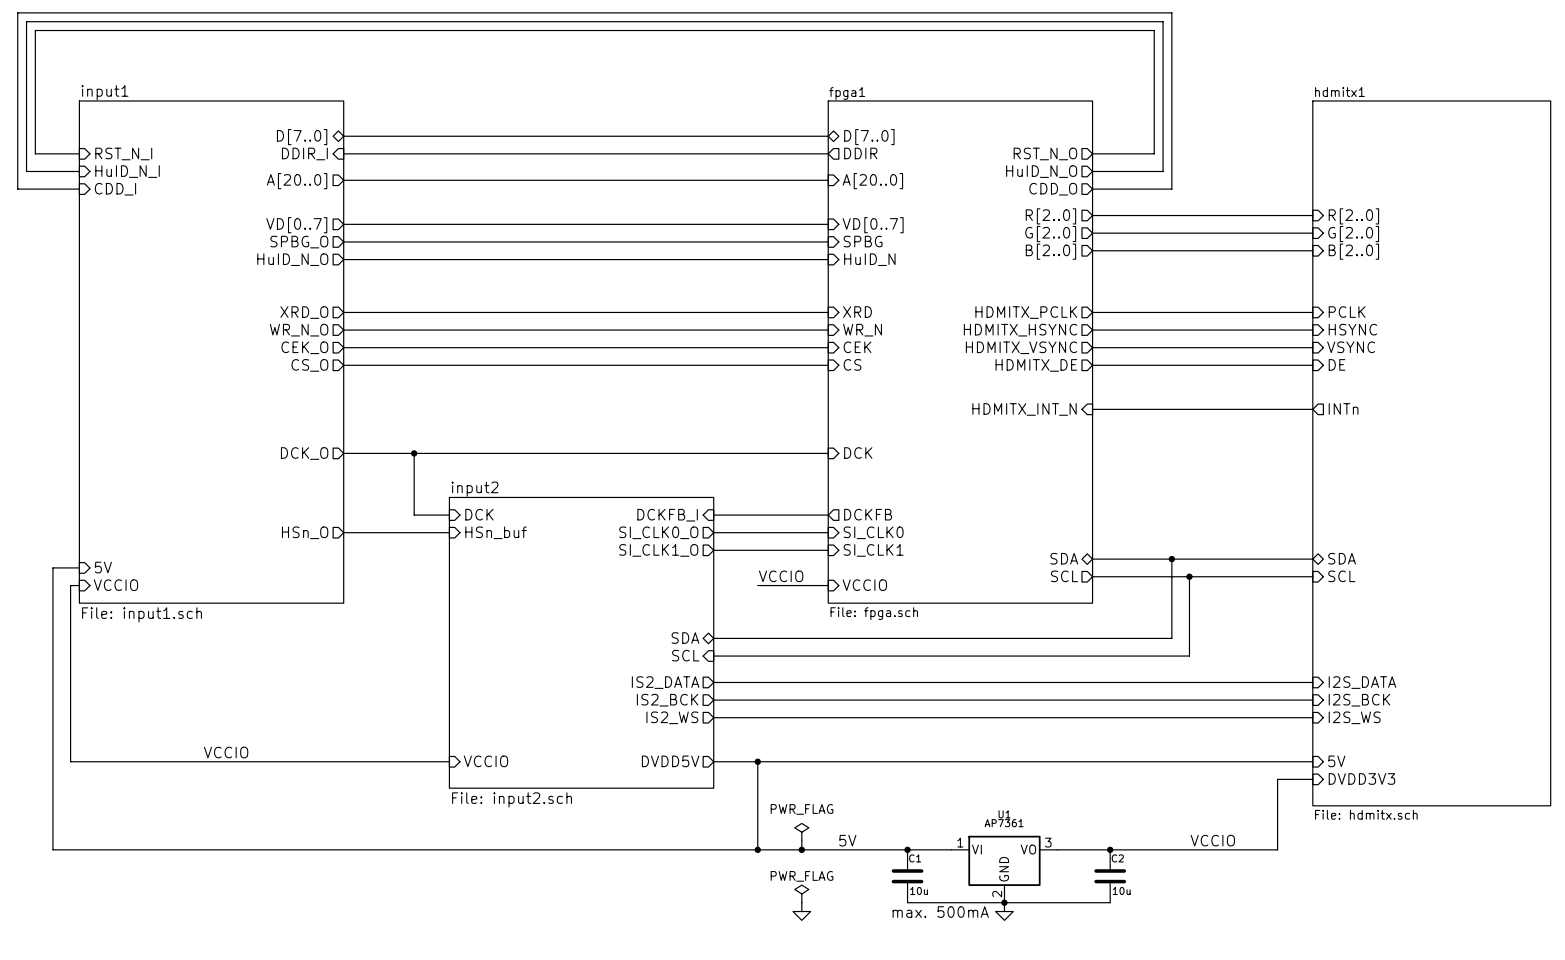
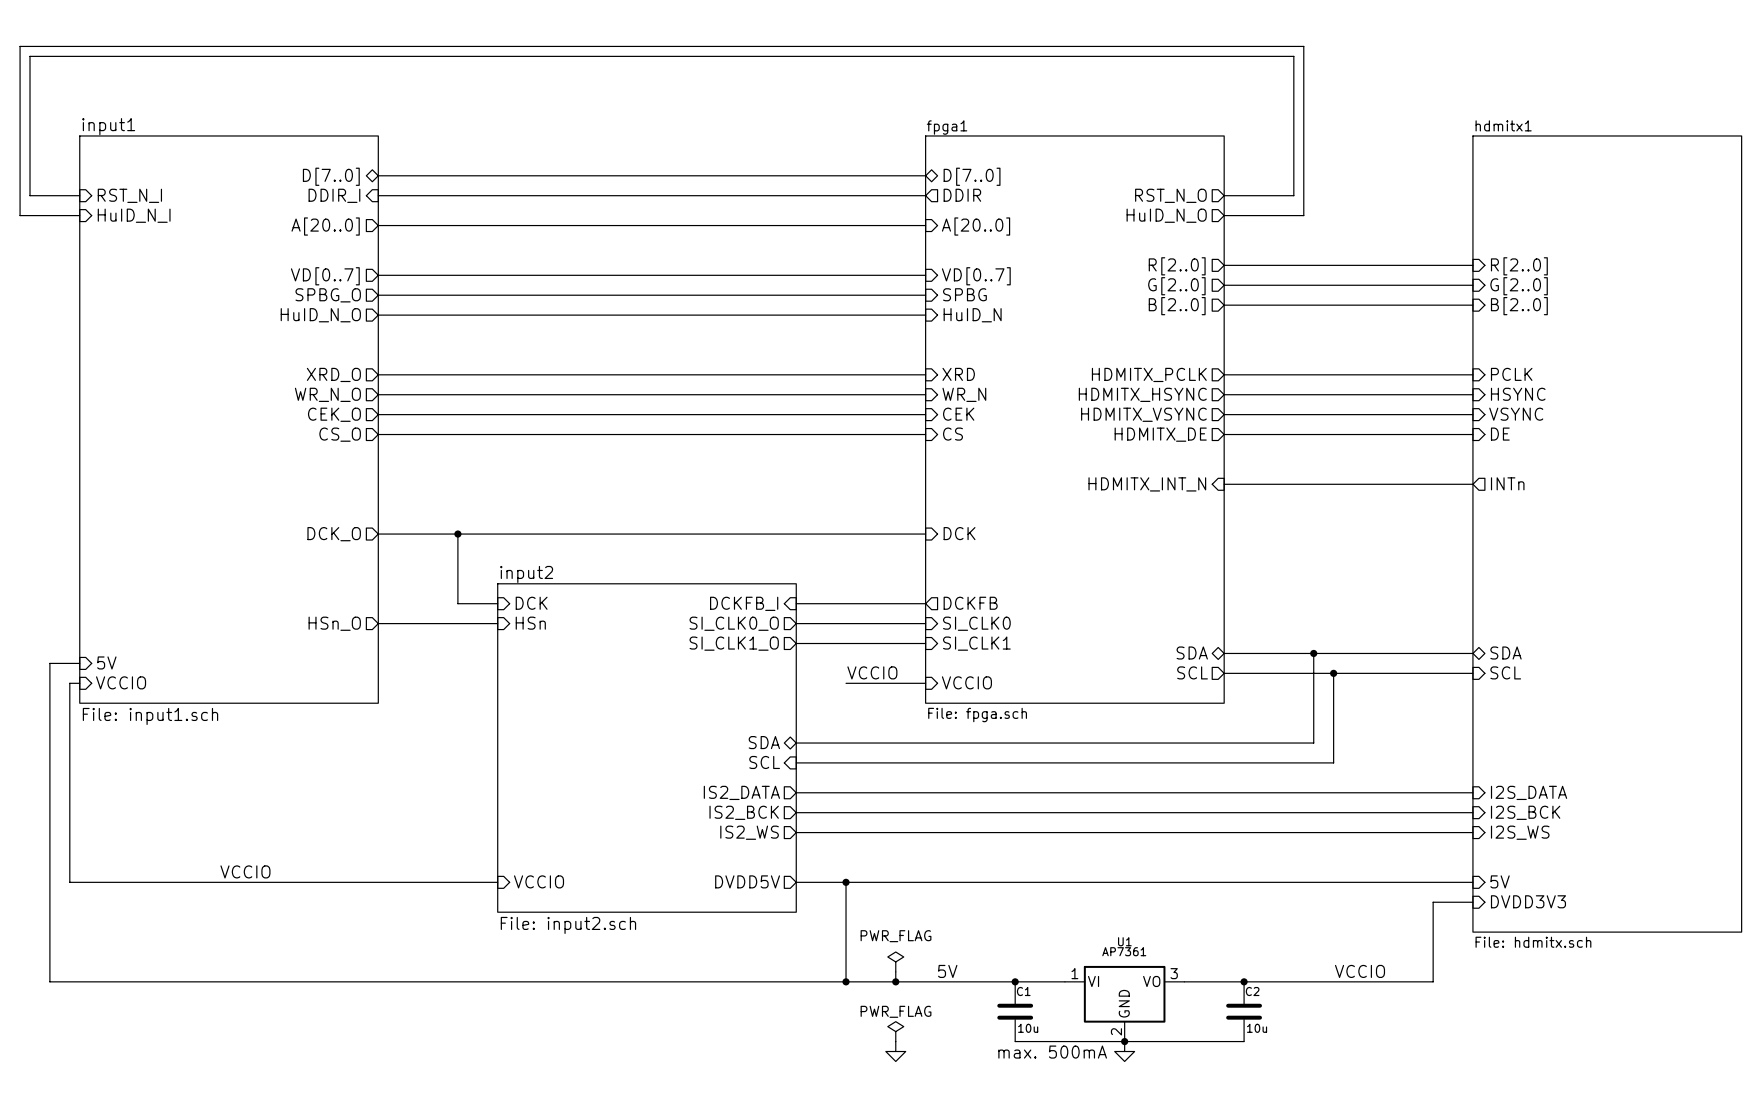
wire: (79, 189) (17, 189) (17, 12) (1171, 12) (1171, 189) (1092, 189) -> none
sheet pin: CDD_I (115, 189) -> none
sheet pin: CDD_O (1053, 189) -> none
sheet pin: HSn_buf (496, 532) -> HSn (530, 623)

